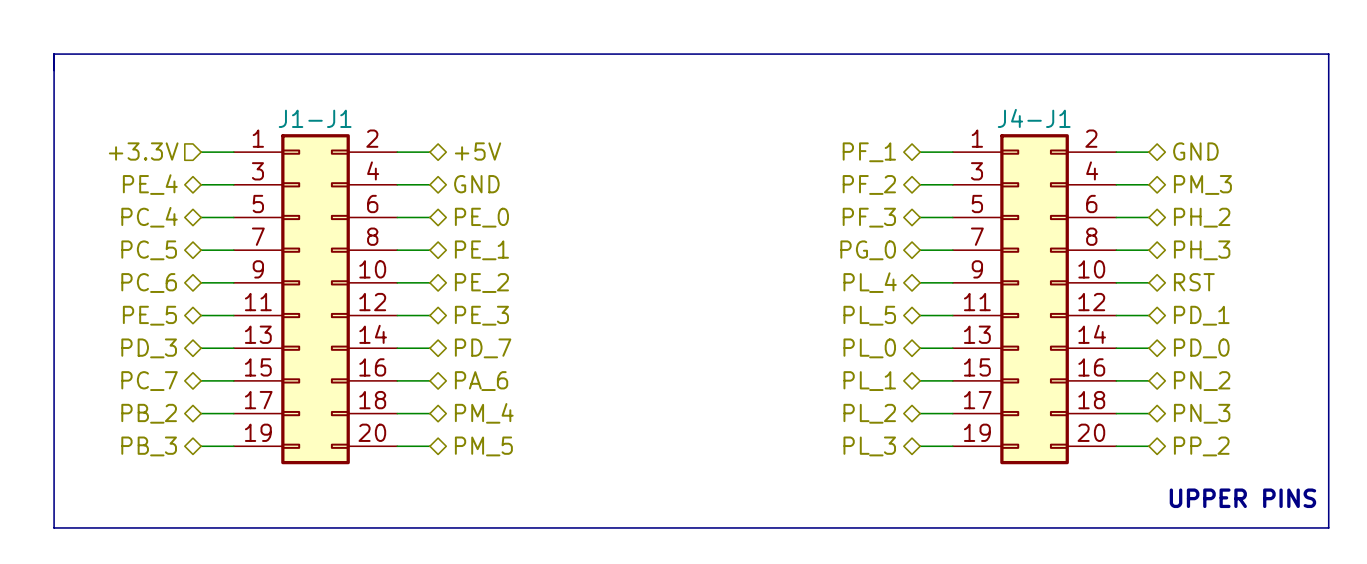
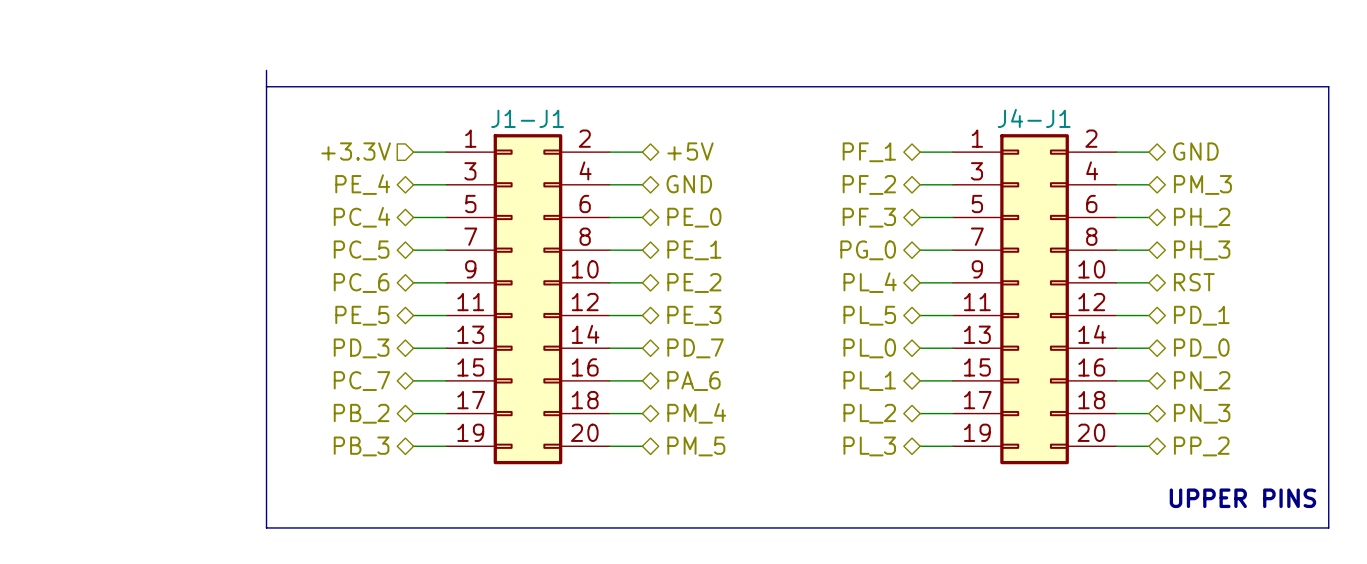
line: none -> (266, 70) (266, 527)
line: (1328, 86) (1328, 54) (54, 54) (54, 527) (266, 527) -> (1328, 86) (266, 86)
hierarchical label position: +3.3V (143, 151) -> +3.3V (356, 151)
hierarchical label position: +5V (478, 151) -> +5V (690, 151)
wire: (201, 152) (233, 152) -> none
wire: (397, 152) (413, 152) -> (429, 152) (446, 152)
wire: none -> (609, 152) (642, 152)
hierarchical label position: PE_4 (150, 184) -> PE_4 (362, 184)
wire: (201, 184) (233, 184) -> none
wire: (397, 184) (413, 184) -> (429, 184) (446, 184)
hierarchical label position: GND (476, 184) -> GND (689, 184)
wire: none -> (609, 184) (642, 184)
hierarchical label position: PC_4 (149, 217) -> PC_4 (361, 217)
wire: (201, 217) (233, 217) -> none
wire: (397, 217) (413, 217) -> (429, 217) (446, 217)
hierarchical label position: PE_0 (481, 217) -> PE_0 (694, 217)
wire: none -> (609, 217) (642, 217)
hierarchical label position: PC_5 (149, 250) -> PC_5 (361, 250)
wire: (201, 250) (233, 250) -> none
wire: (397, 250) (413, 250) -> (429, 250) (446, 250)
hierarchical label position: PE_1 (481, 250) -> PE_1 (694, 250)
wire: none -> (609, 250) (642, 250)
wire: (201, 282) (233, 282) -> none
wire: (397, 282) (413, 282) -> (429, 282) (446, 282)
wire: none -> (609, 282) (642, 282)
hierarchical label position: PC_6 (149, 283) -> PC_6 (361, 283)
hierarchical label position: PE_2 (481, 283) -> PE_2 (694, 283)
J1-J1 position: (315, 299) -> (527, 299)
hierarchical label position: PE_5 (149, 315) -> PE_5 (362, 315)
wire: (201, 315) (233, 315) -> none
wire: (397, 315) (413, 315) -> (429, 315) (446, 315)
hierarchical label position: PE_3 (481, 315) -> PE_3 (694, 315)
wire: none -> (609, 315) (642, 315)
hierarchical label position: PD_3 (149, 348) -> PD_3 (361, 348)
wire: (201, 348) (233, 348) -> none
wire: (397, 348) (413, 348) -> (429, 348) (446, 348)
hierarchical label position: PD_7 (483, 348) -> PD_7 (695, 348)
wire: none -> (609, 348) (642, 348)
wire: (201, 380) (233, 380) -> none
wire: (397, 380) (413, 380) -> (429, 380) (446, 380)
wire: none -> (609, 380) (642, 380)
hierarchical label position: PC_7 (149, 381) -> PC_7 (361, 381)
hierarchical label position: PA_6 (481, 381) -> PA_6 (693, 381)
hierarchical label position: PB_2 (149, 413) -> PB_2 (361, 413)
wire: (201, 413) (233, 413) -> none
wire: (397, 413) (413, 413) -> (429, 413) (446, 413)
hierarchical label position: PM_4 (484, 413) -> PM_4 (696, 413)
wire: none -> (609, 413) (642, 413)
hierarchical label position: PB_3 (149, 446) -> PB_3 (361, 446)
wire: (201, 446) (233, 446) -> none
wire: (397, 446) (413, 446) -> (429, 446) (446, 446)
hierarchical label position: PM_5 (483, 446) -> PM_5 (696, 446)
wire: none -> (609, 446) (642, 446)

